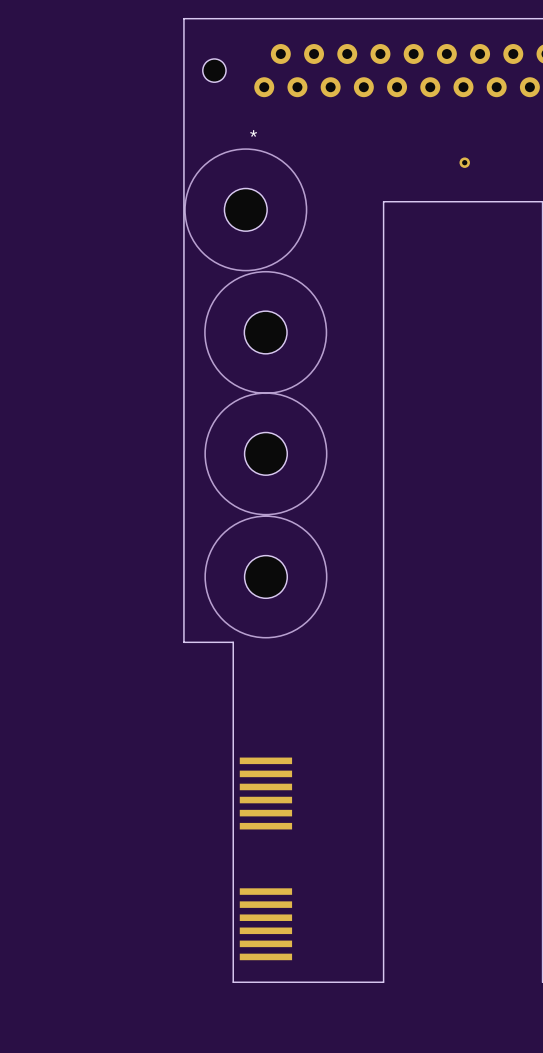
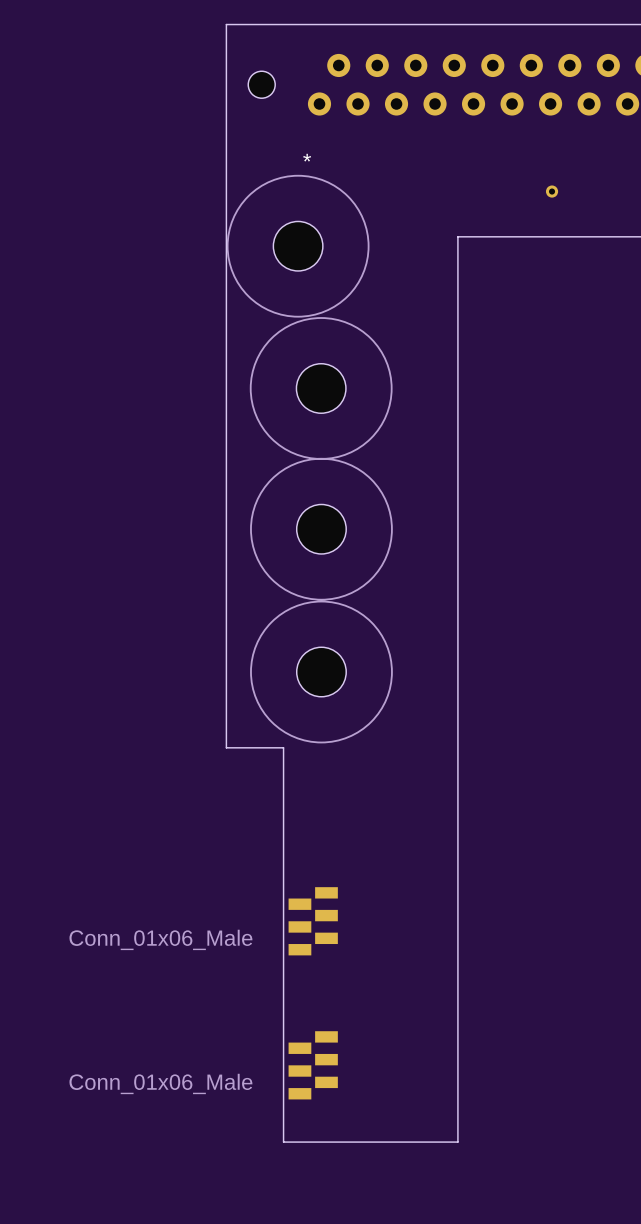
part footprint: [239, 757, 293, 830] -> [288, 887, 338, 956]
part value: none -> Conn_01x06_Male (160, 939)
part footprint: [239, 888, 293, 961] -> [288, 1031, 338, 1100]
part value: none -> Conn_01x06_Male (160, 1083)

